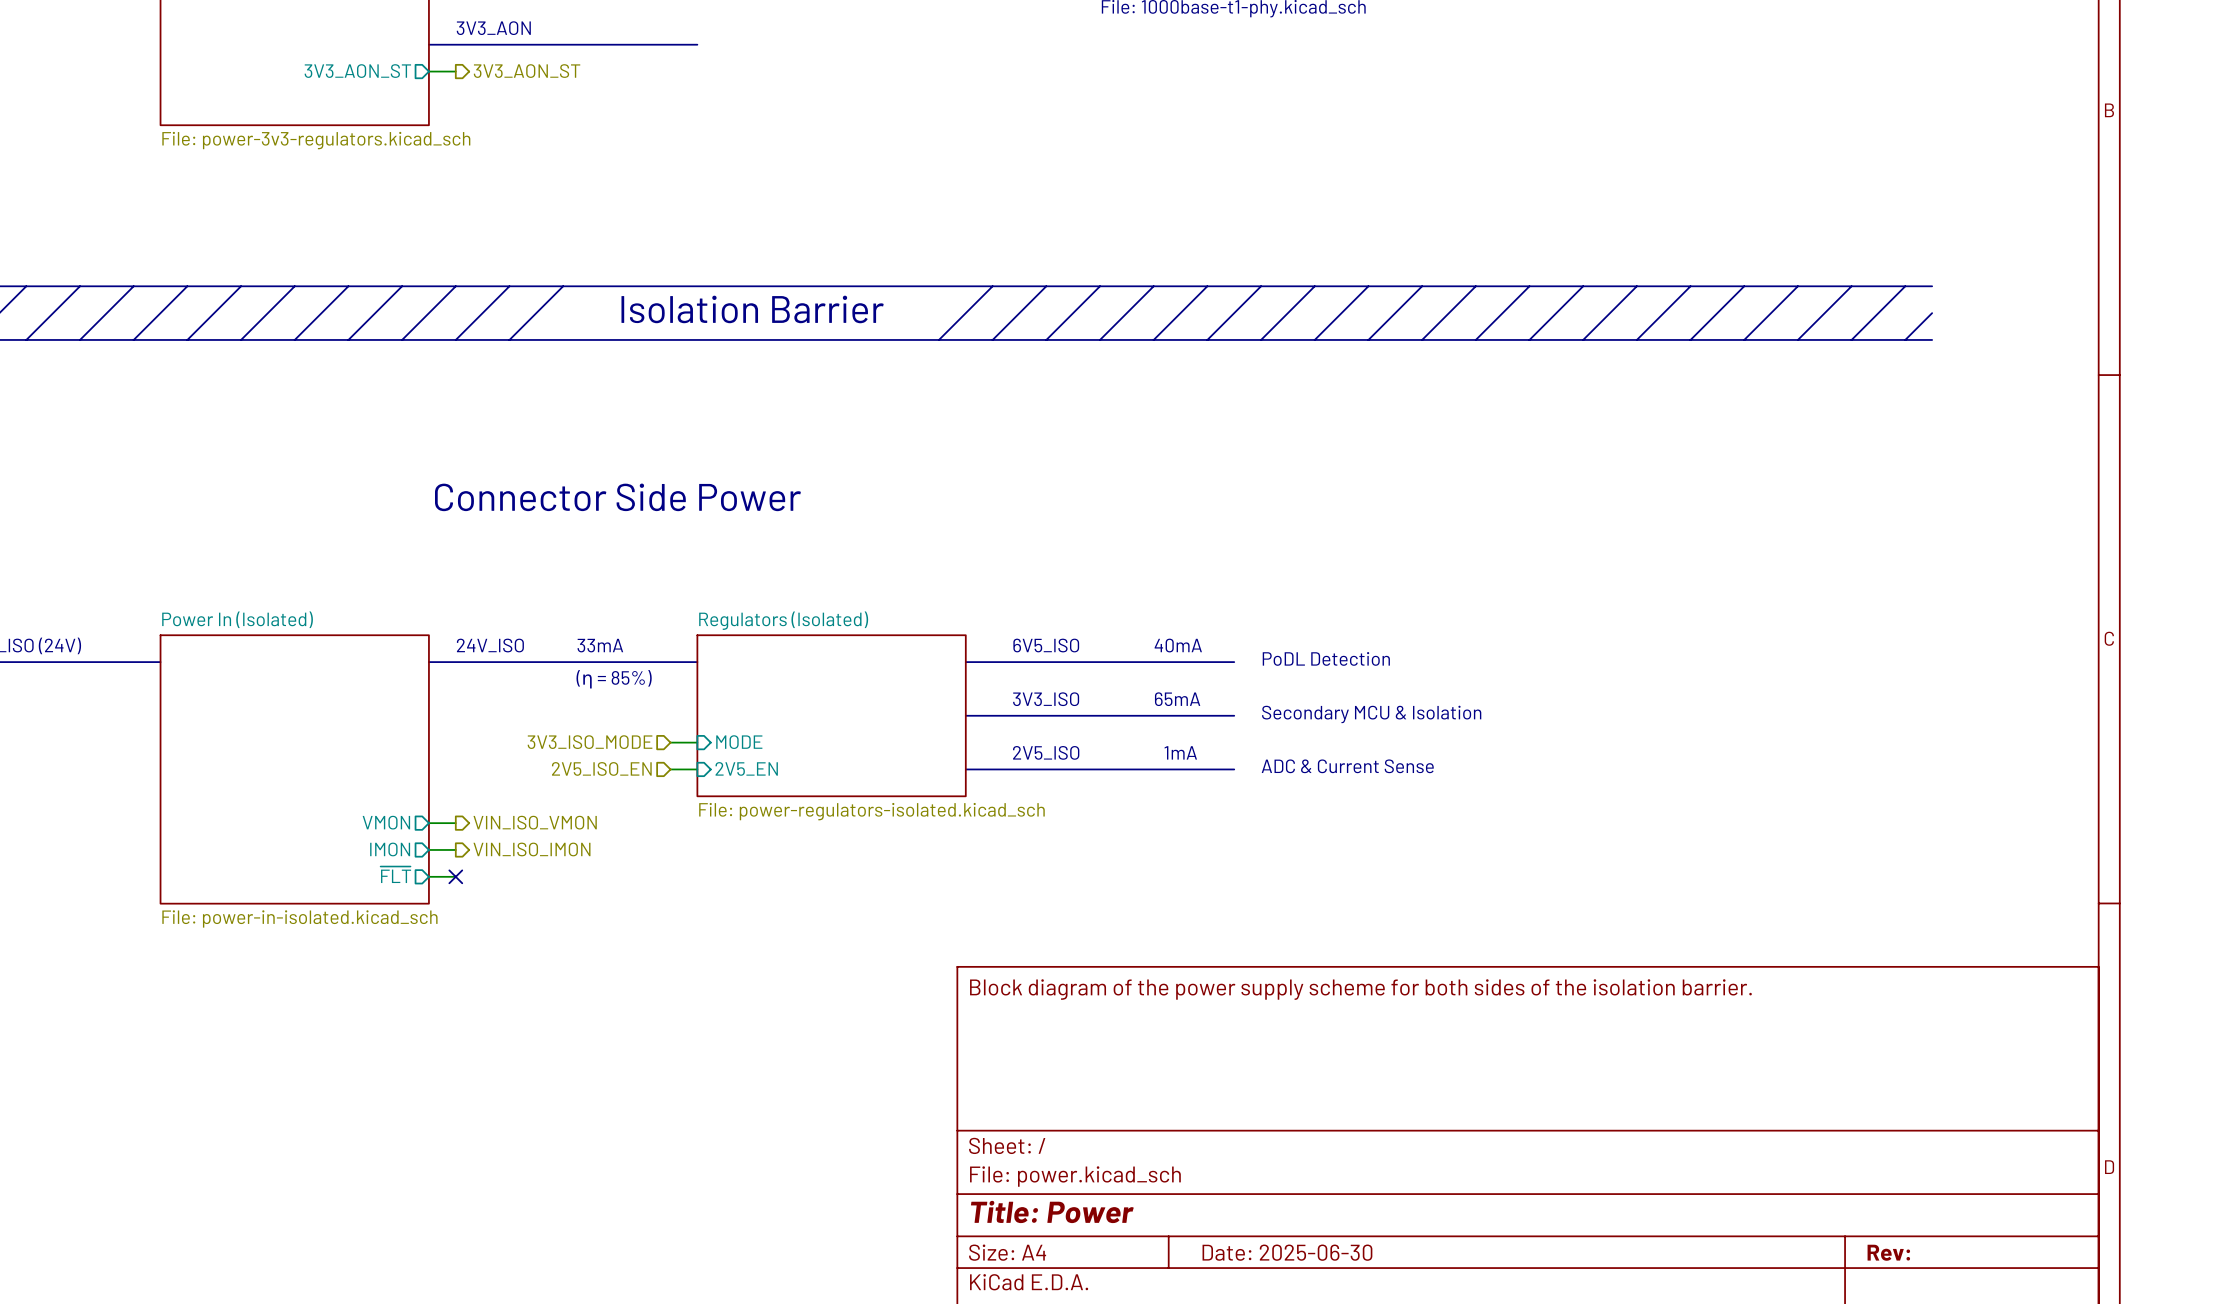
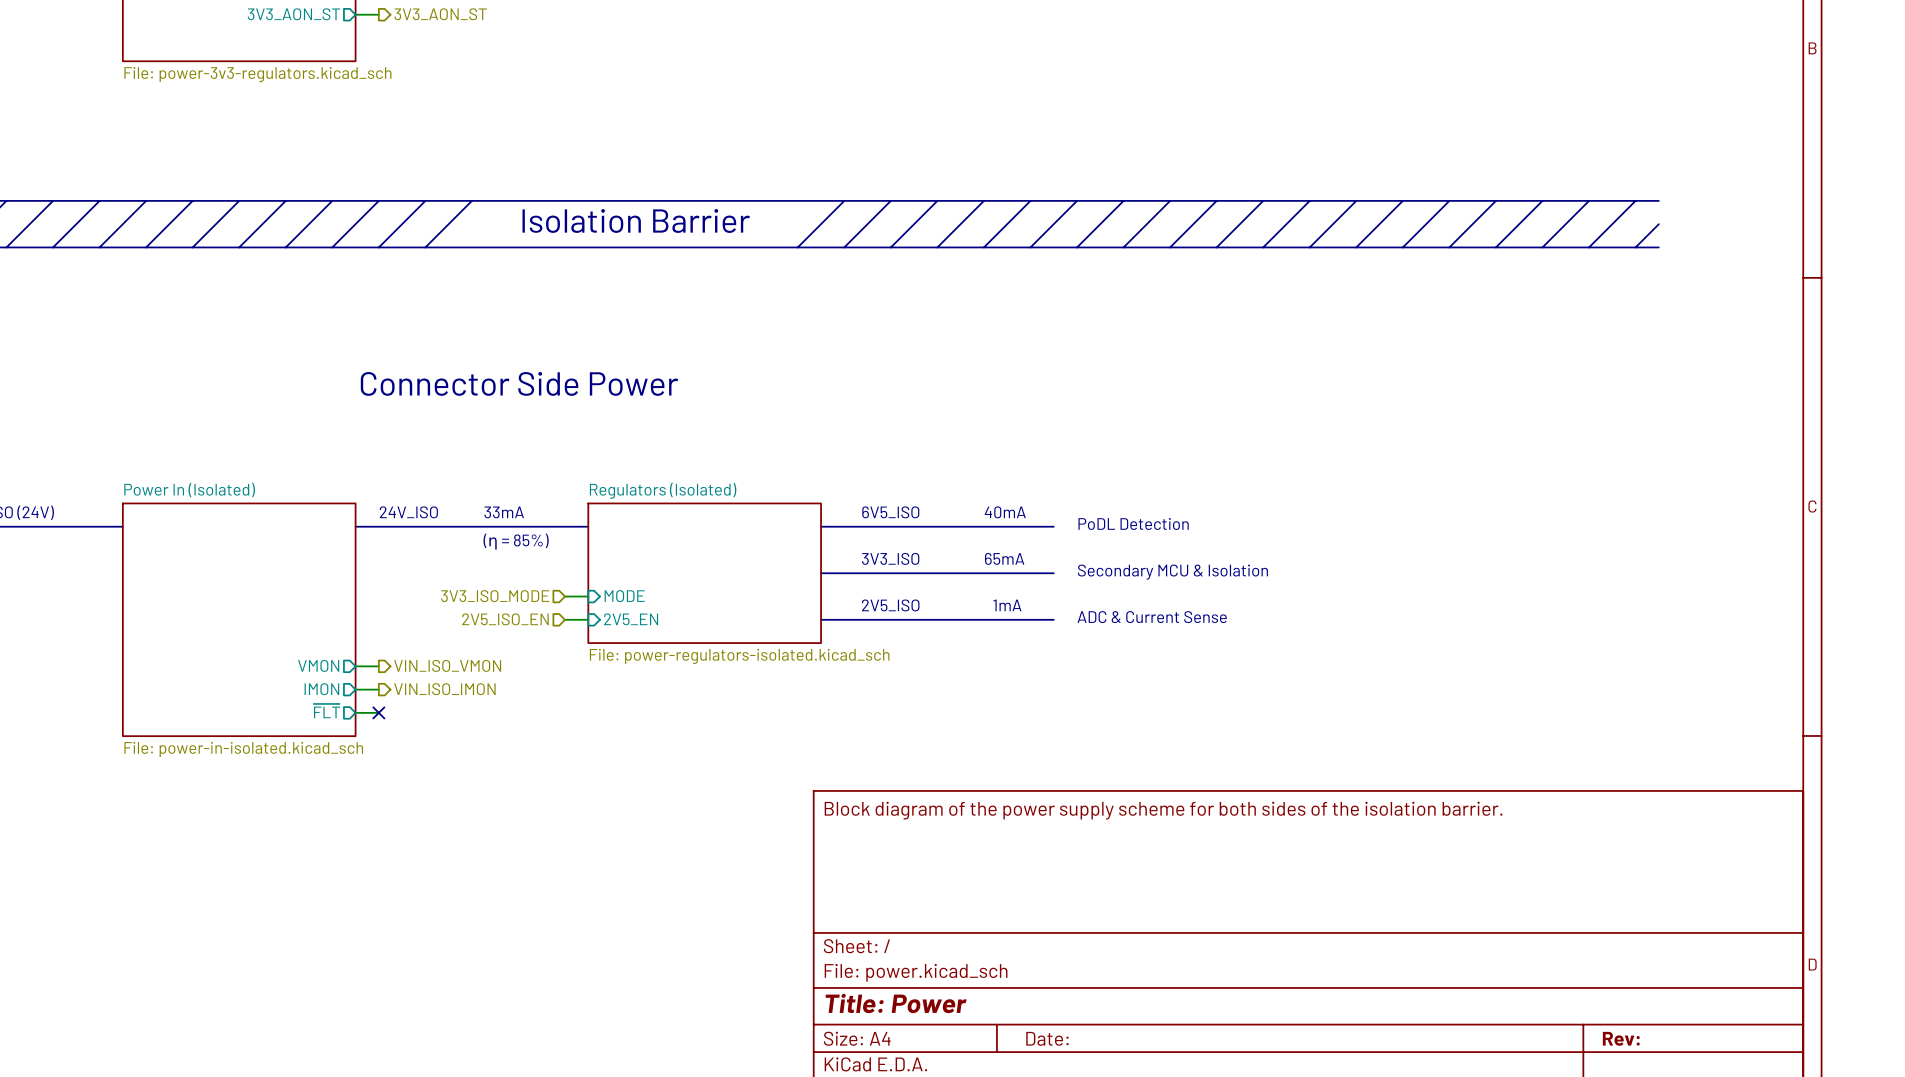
title block: Date: 2025-06-30 (1287, 1252) -> Date: (1047, 1038)

